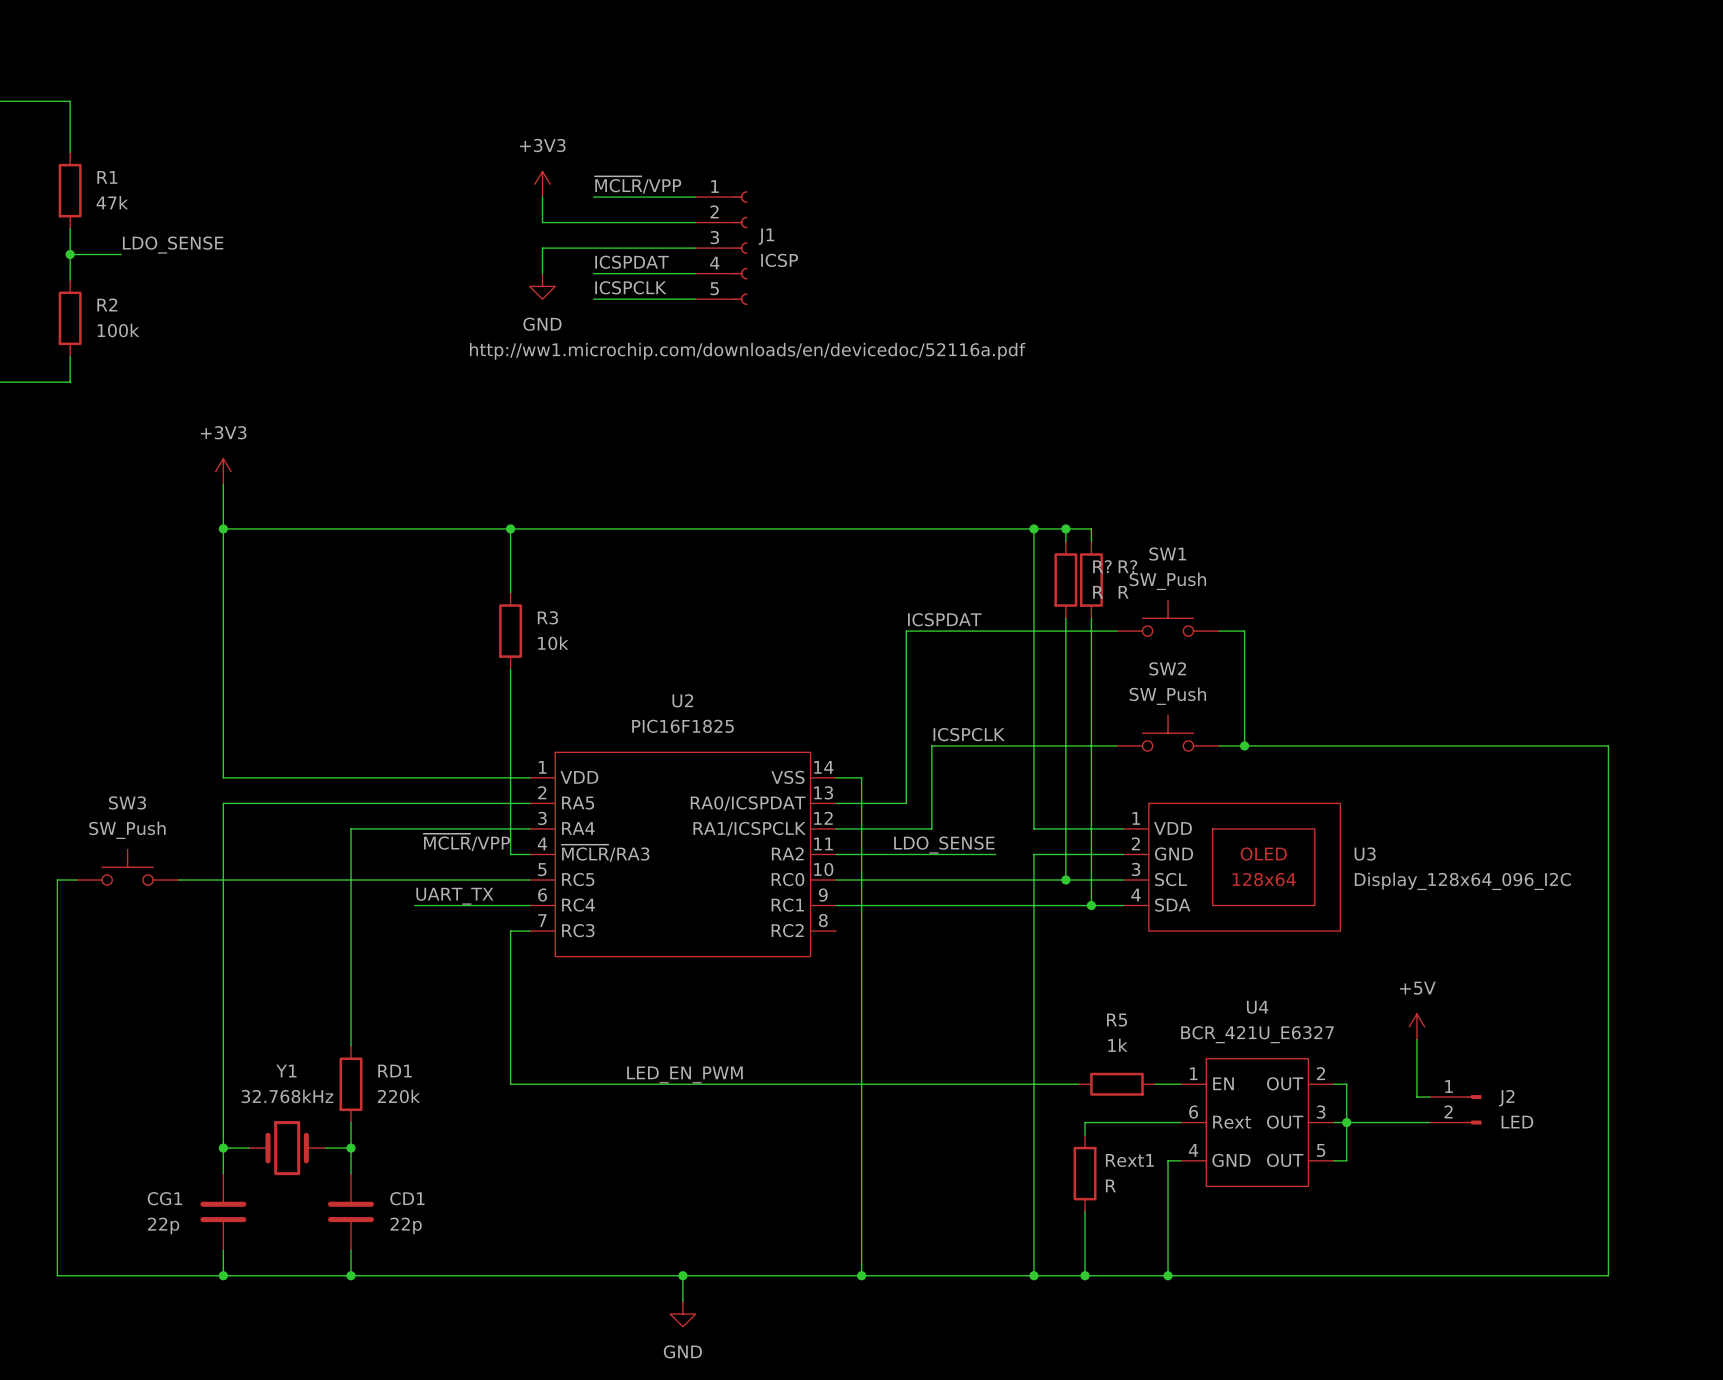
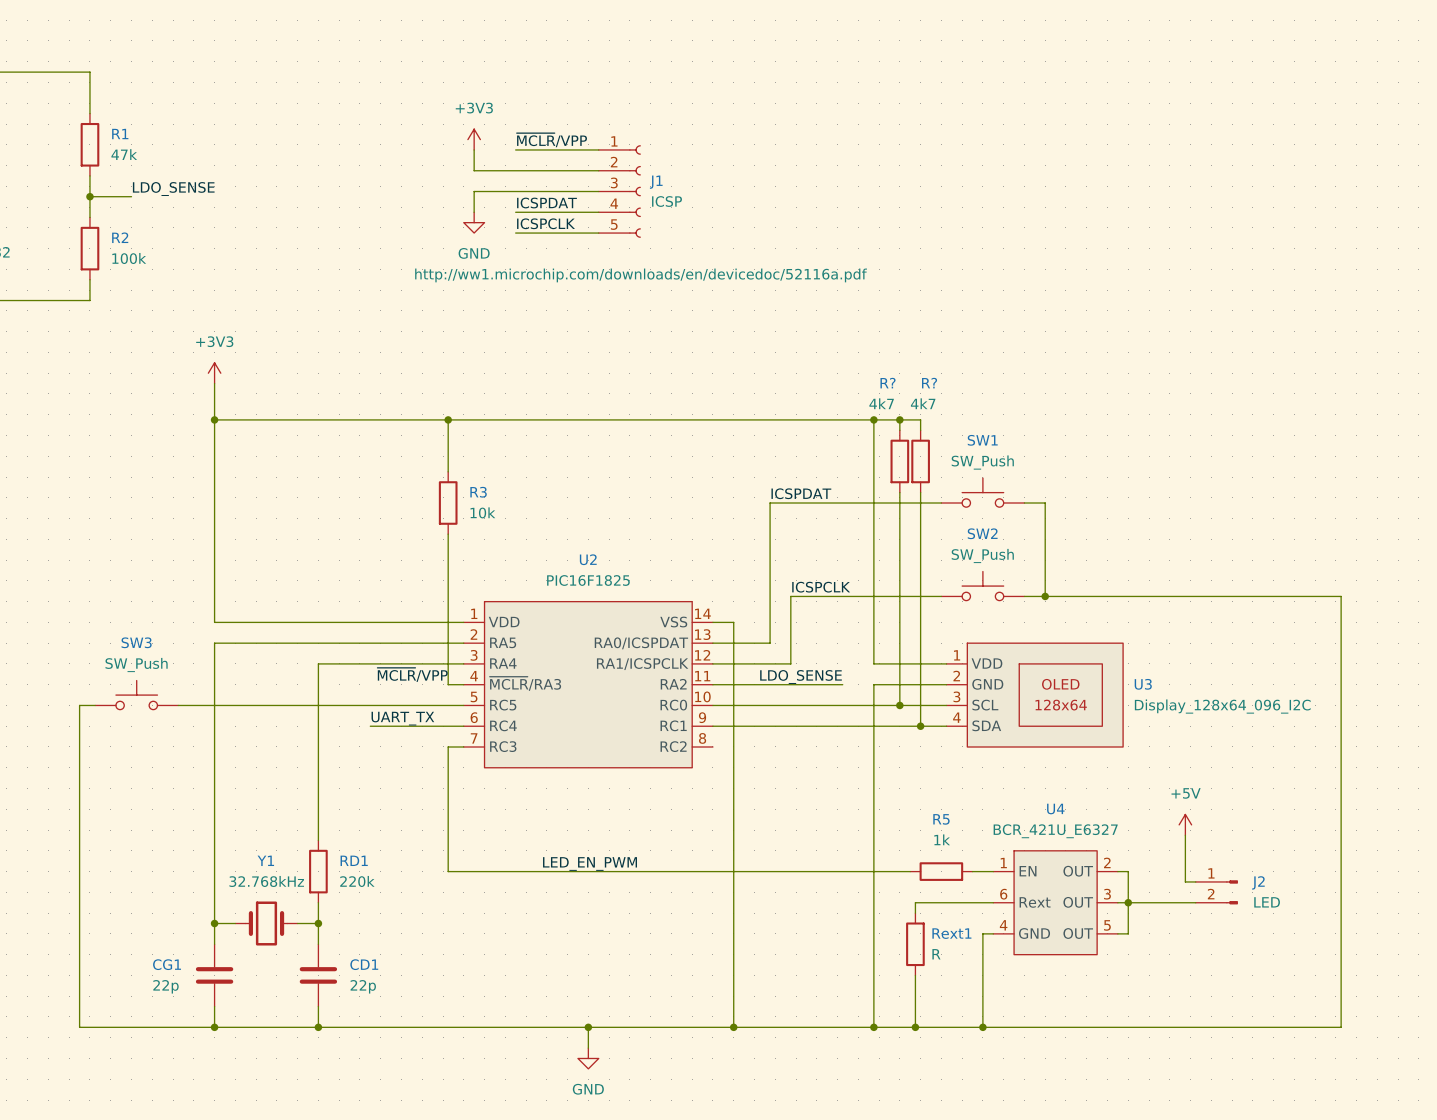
R? name position: R? (1102, 566) -> R? (888, 383)
R? name position: R? (1127, 566) -> R? (929, 383)
R? value: R (1098, 592) -> 4k7 (881, 403)
R? value: R (1123, 592) -> 4k7 (923, 403)

